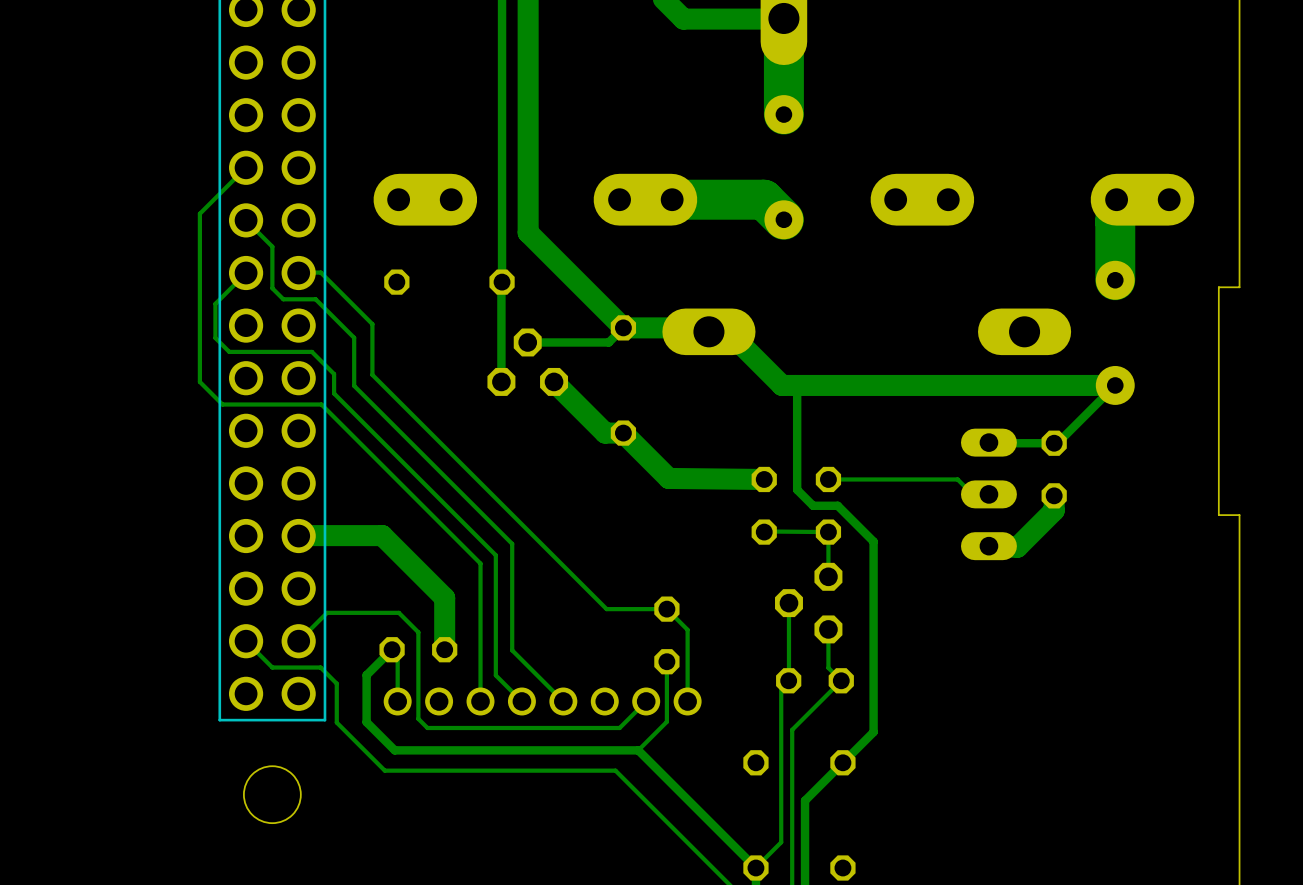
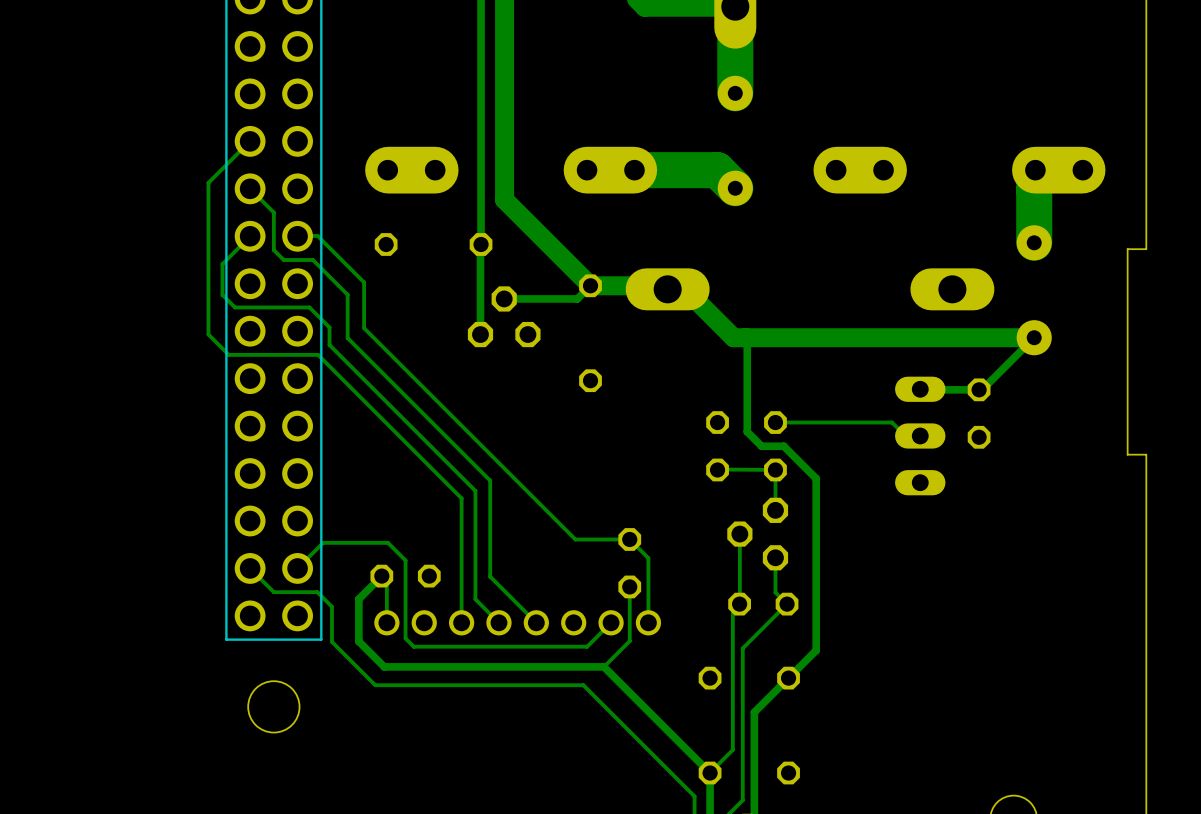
bottom track: (554, 381) (605, 433) (623, 433) (668, 478) (764, 479) -> none
bottom track: (1054, 495) (1054, 510) (1017, 547) (988, 546) -> none
bottom track: (298, 536) (382, 535) (444, 597) (444, 649) -> none

